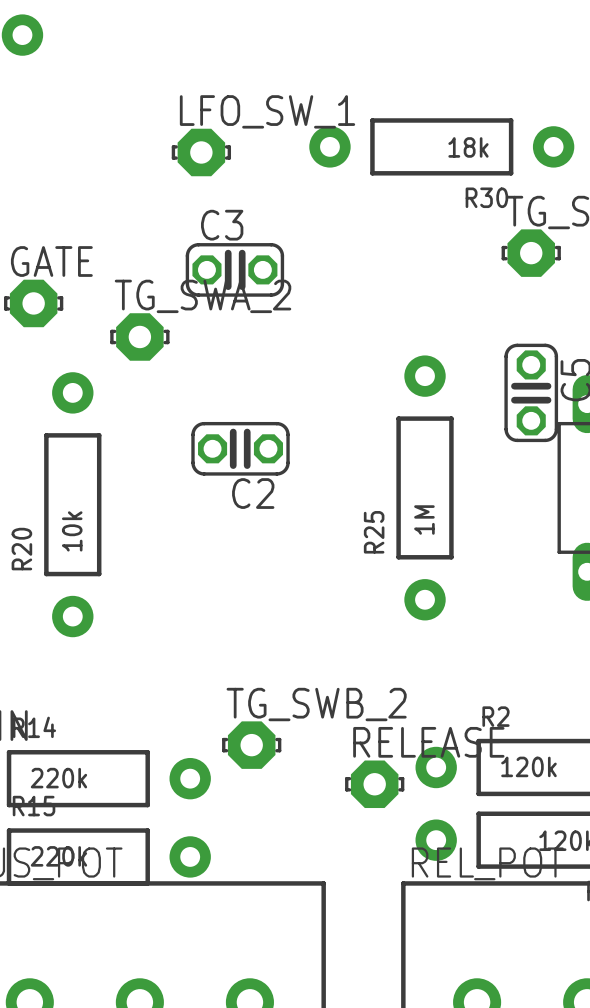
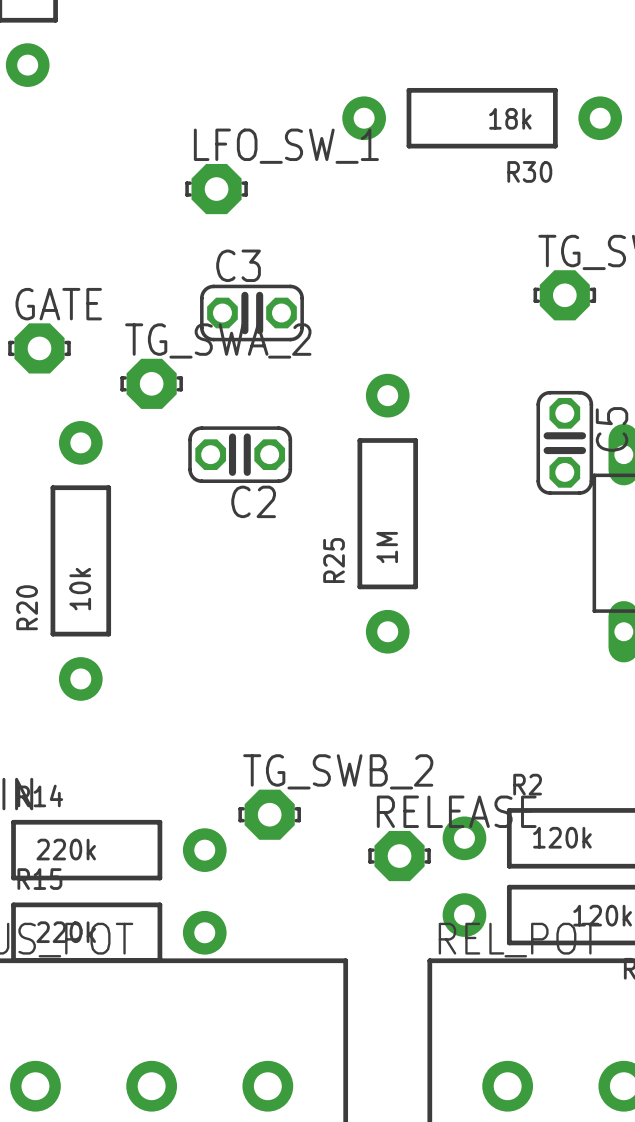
R30 position: (441, 146) -> (482, 118)
C2 position: (240, 448) -> (240, 454)
R25 position: (425, 487) -> (387, 513)

